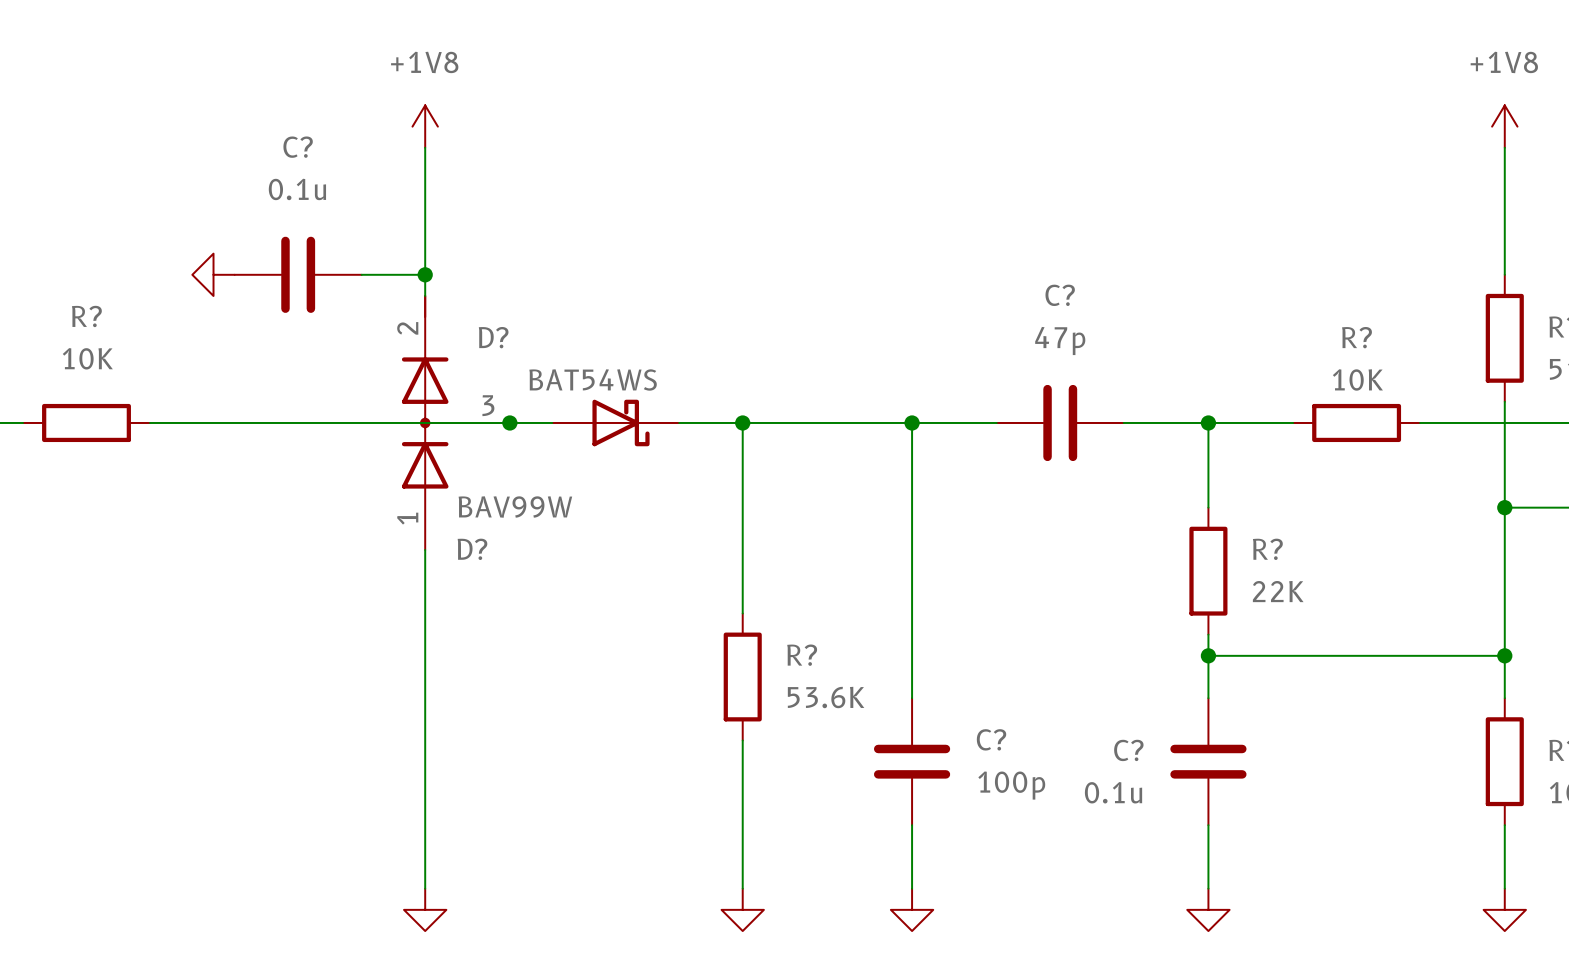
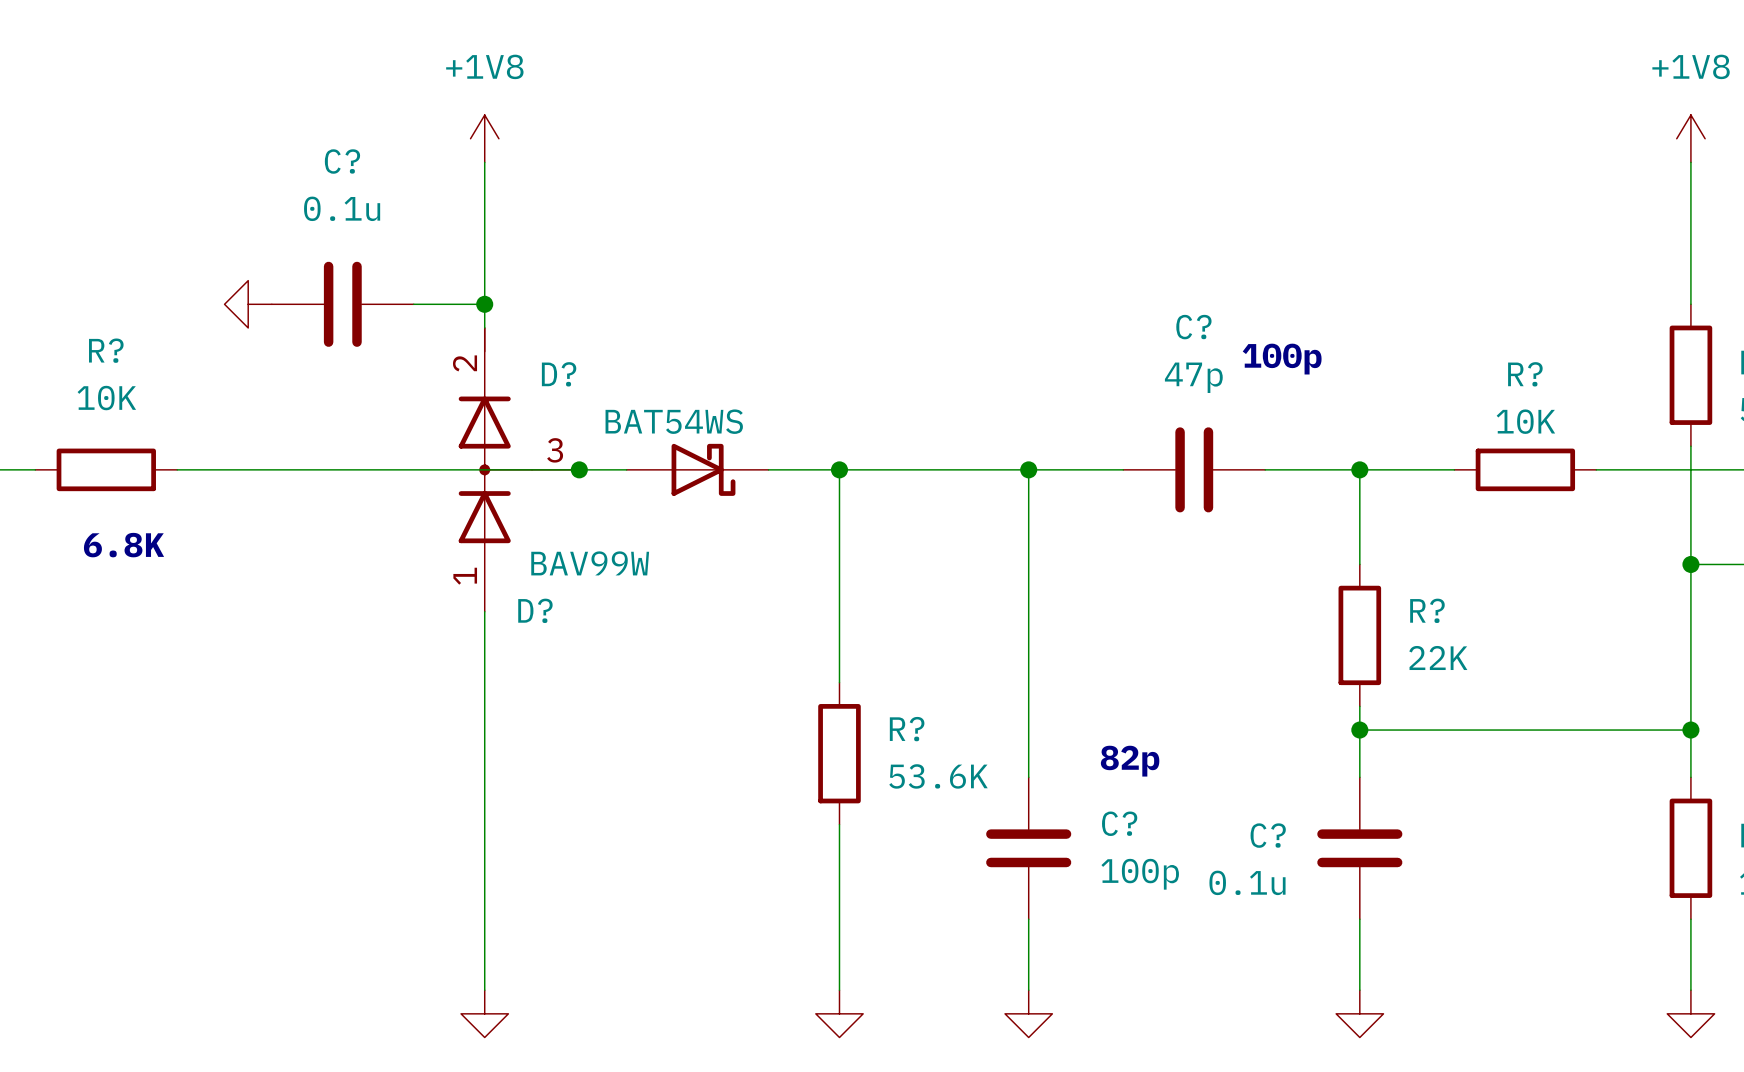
text: none -> 100p (1282, 359)
text: none -> 6.8K (124, 545)
text: none -> 82p (1130, 761)

